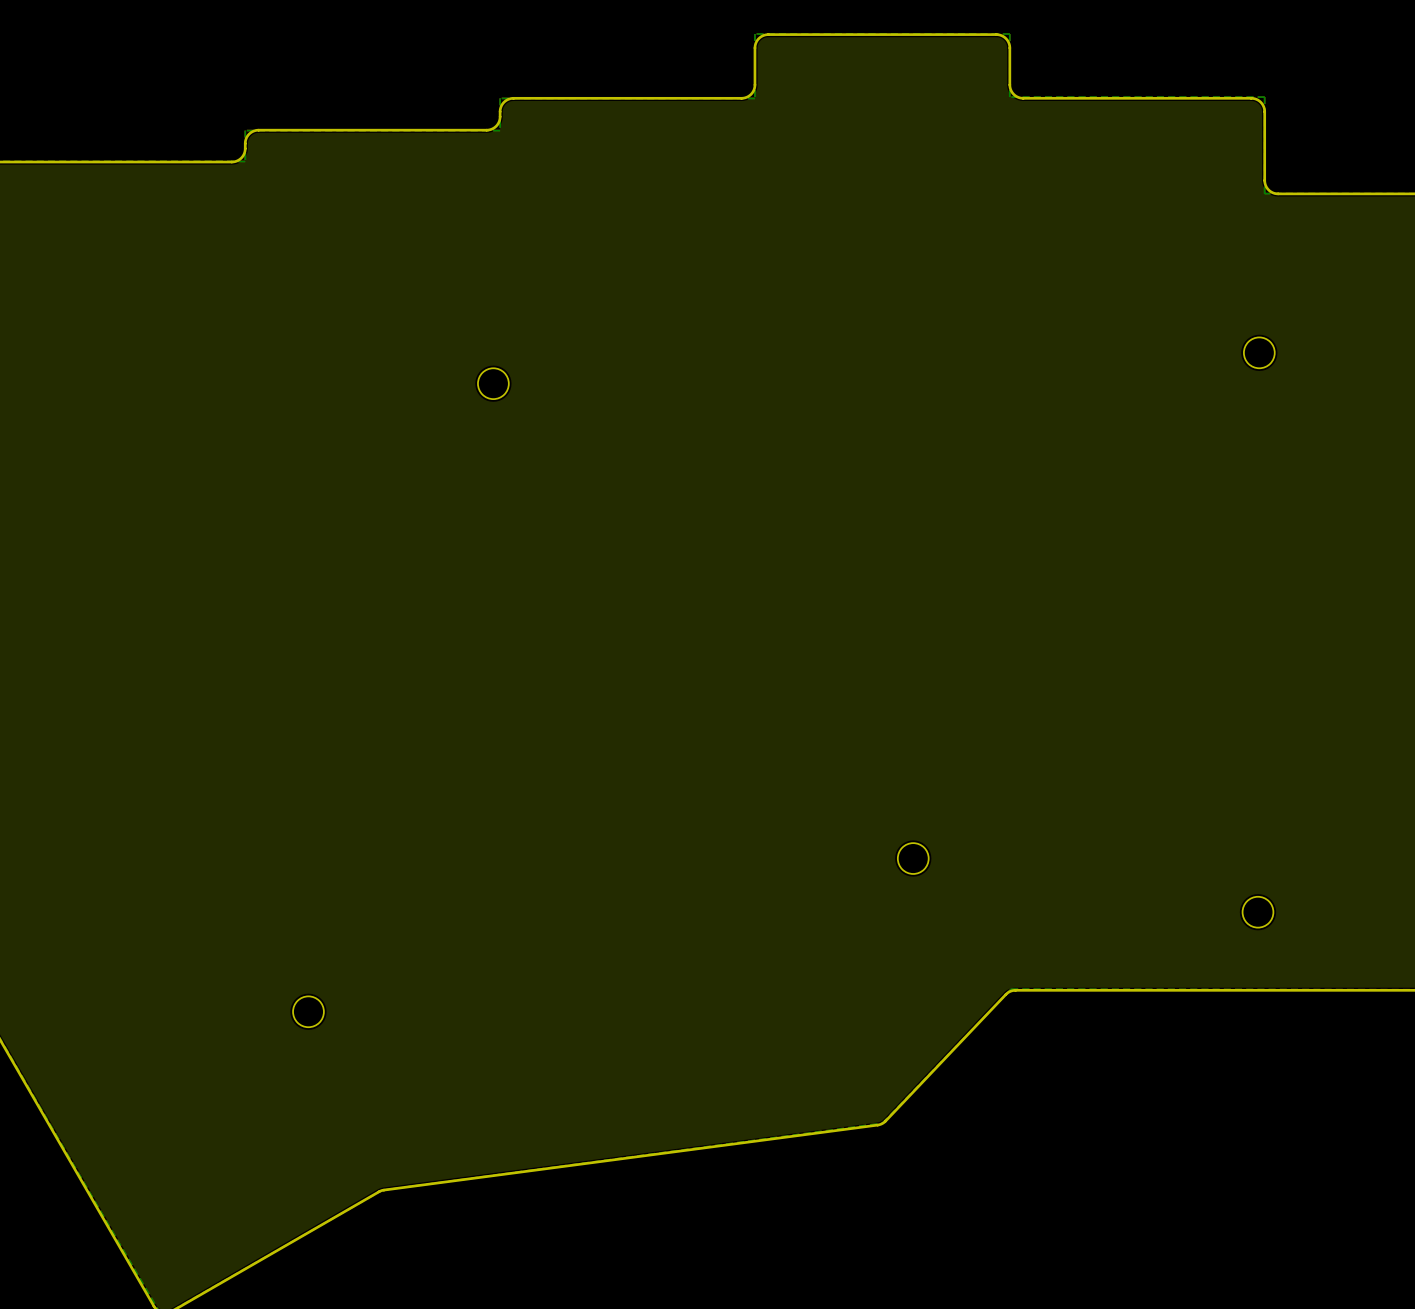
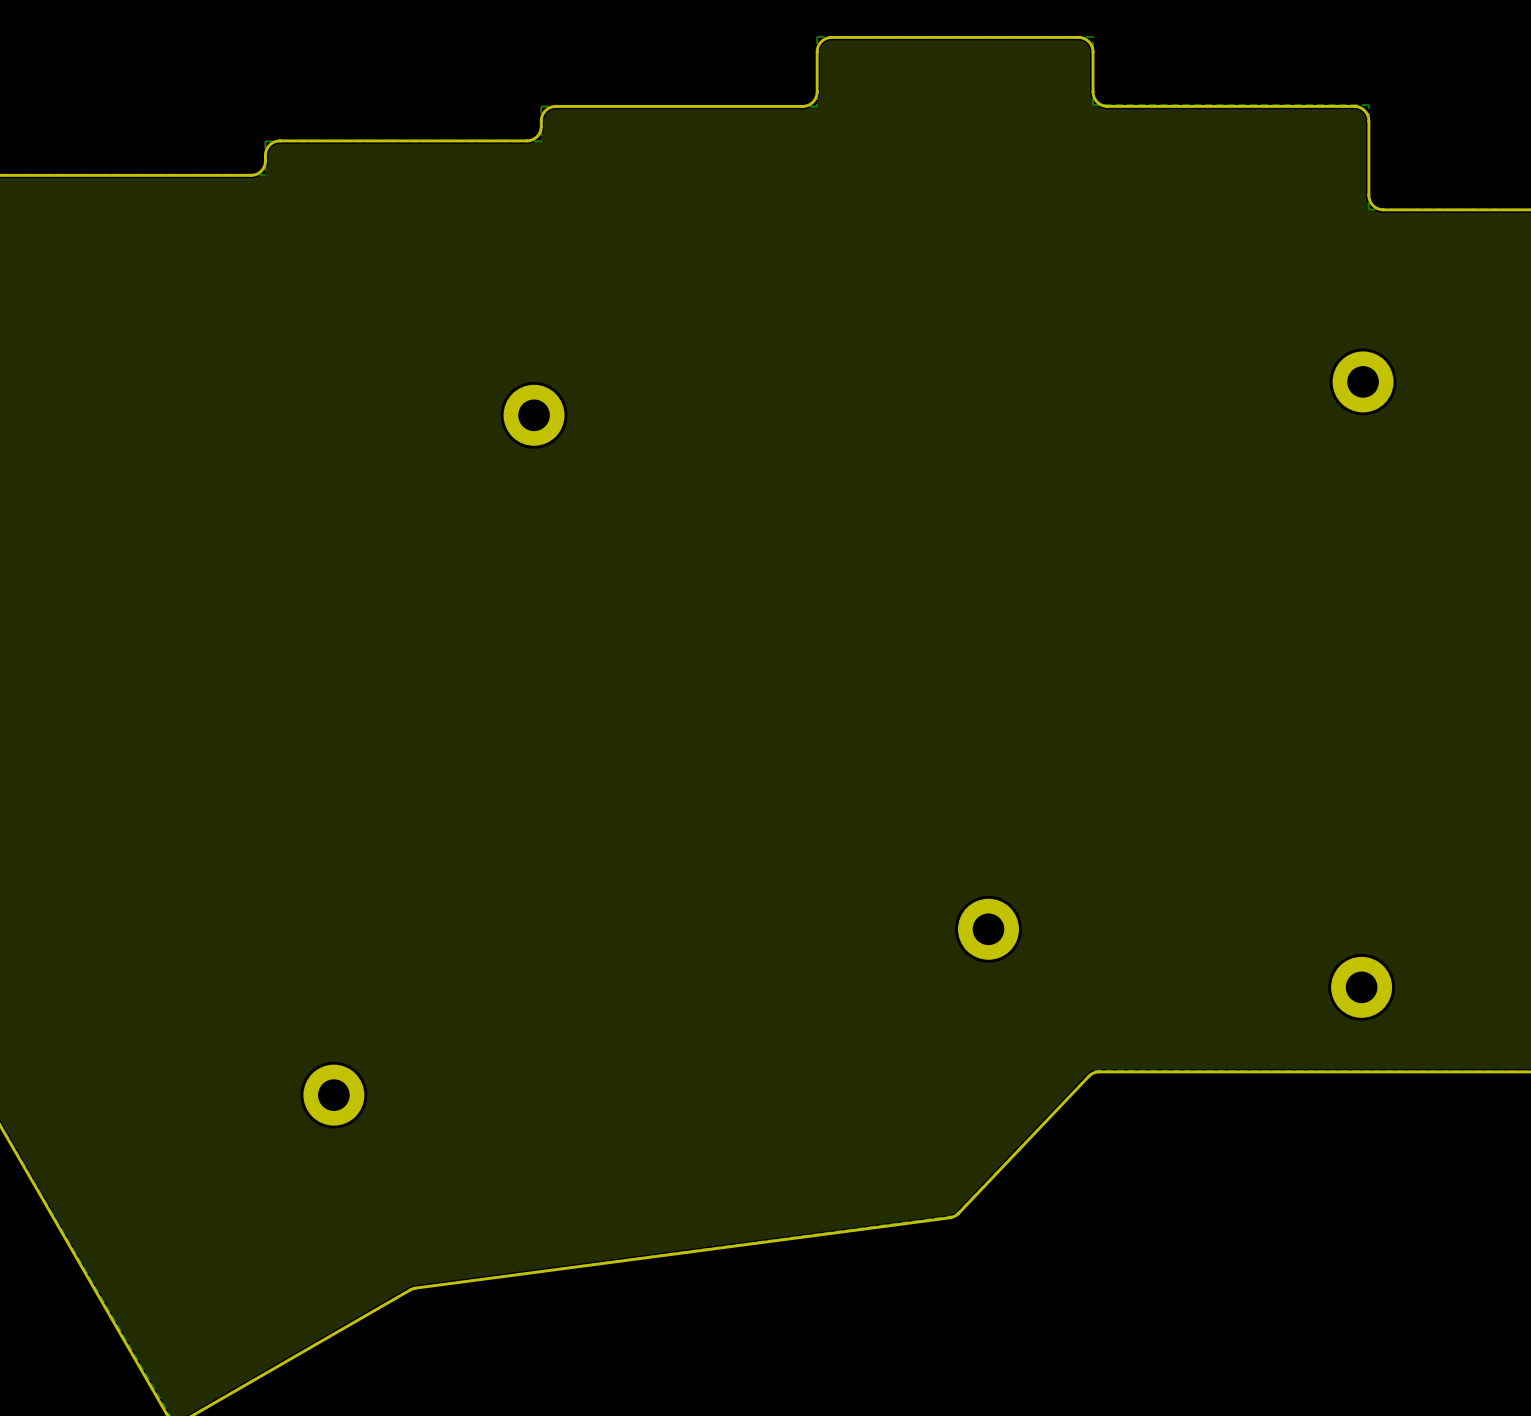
drawing: [1243, 336, 1276, 369] -> none
part: none -> (1363, 381)
drawing: [477, 367, 510, 400] -> none
part: none -> (534, 415)
drawing: [897, 842, 930, 875] -> none
part: none -> (988, 929)
drawing: [1241, 896, 1275, 929] -> none
part: none -> (1361, 987)
drawing: [292, 995, 325, 1028] -> none
part: none -> (333, 1095)

